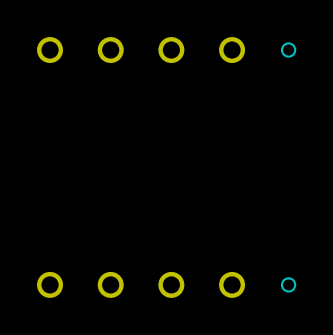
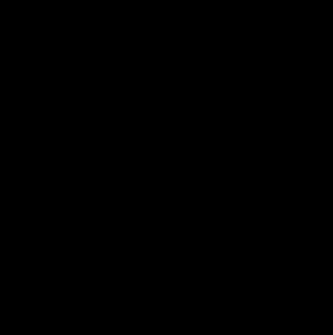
part: (166, 50) -> none
part: (166, 284) -> none

